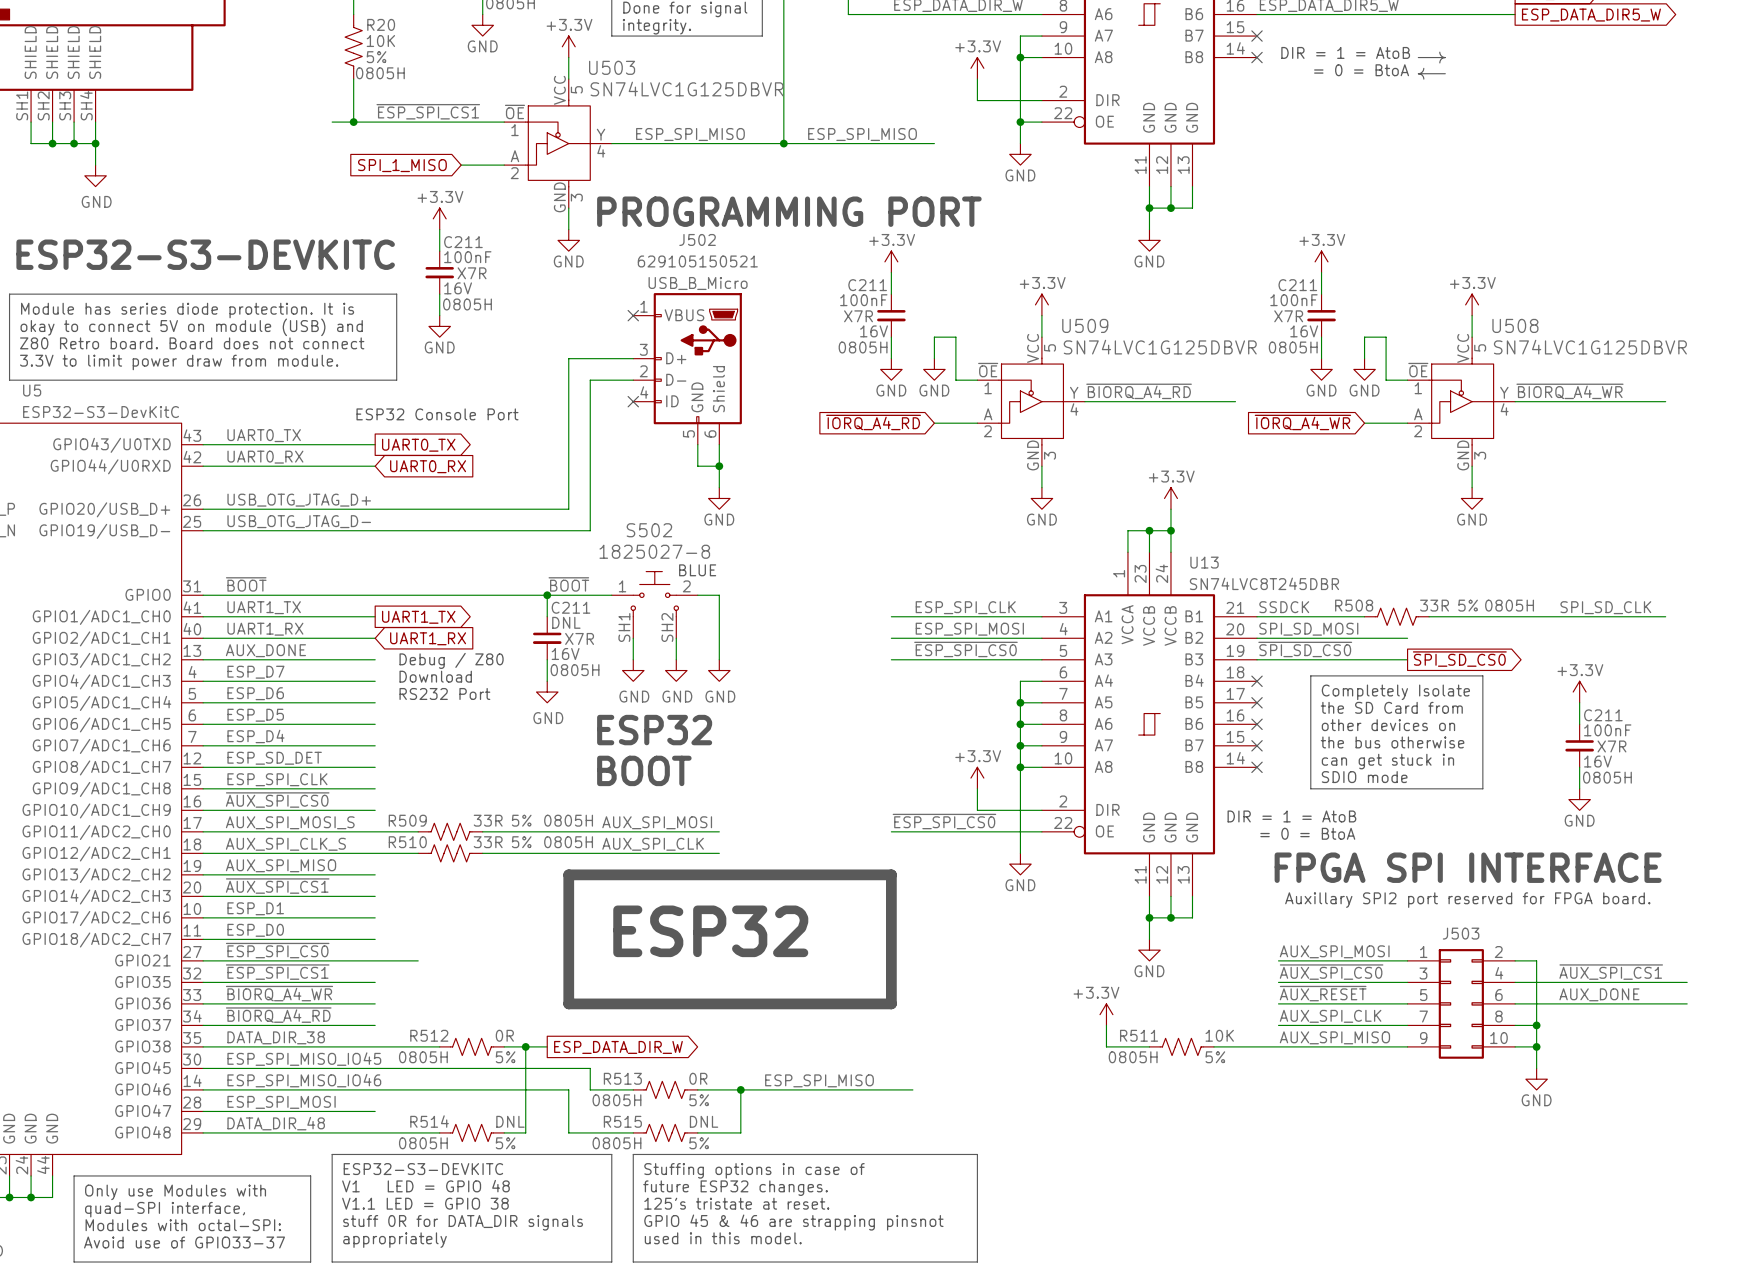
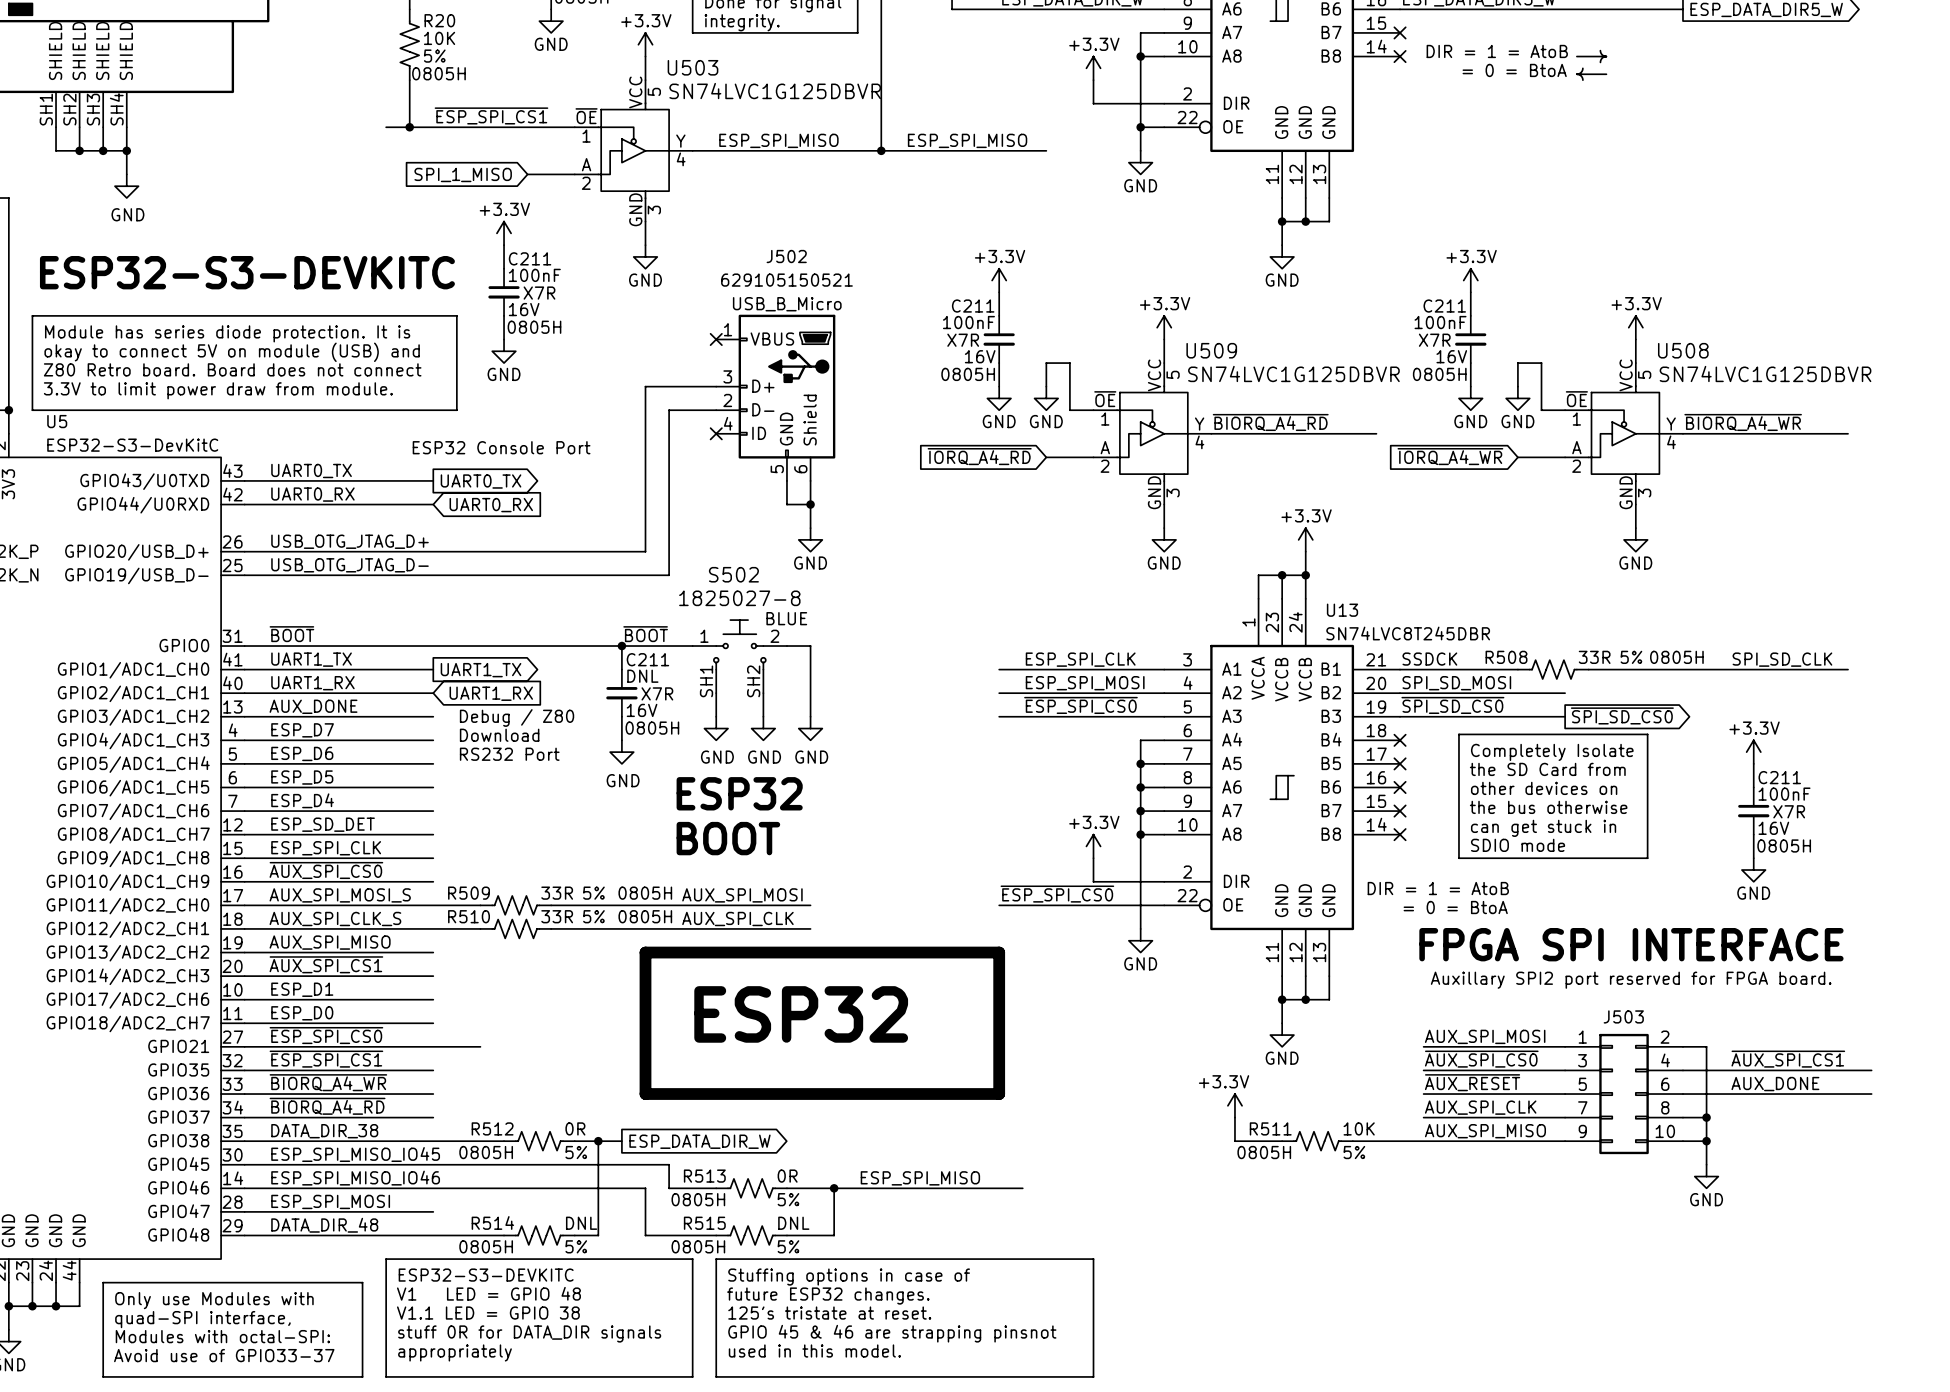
text: PROGRAMMING PORT (789, 211) -> none

